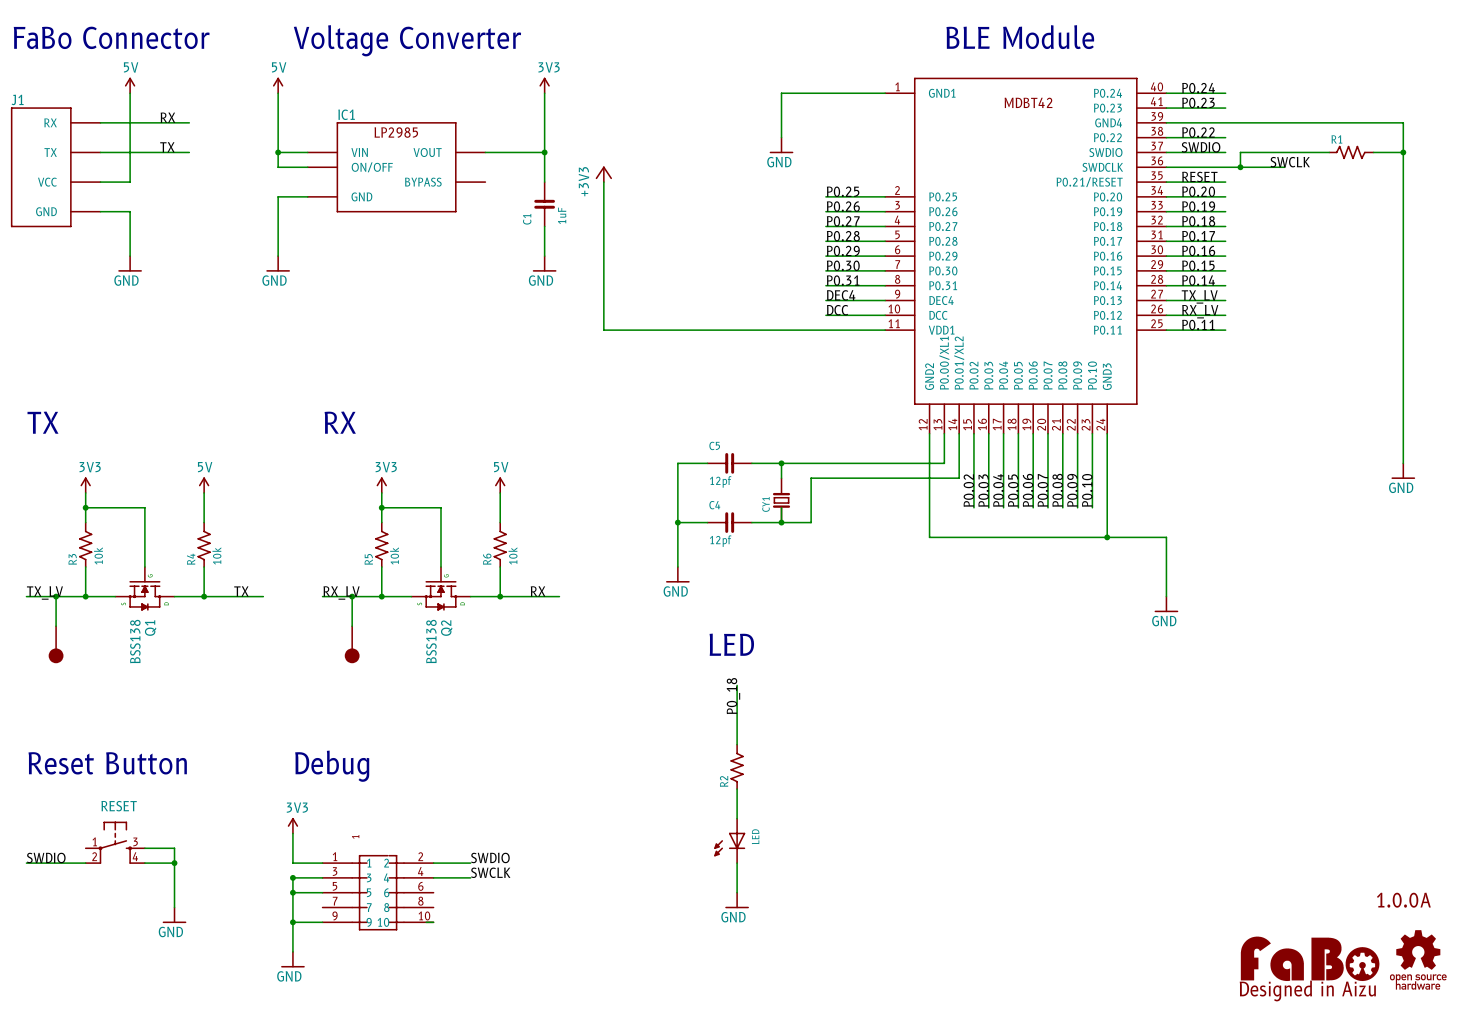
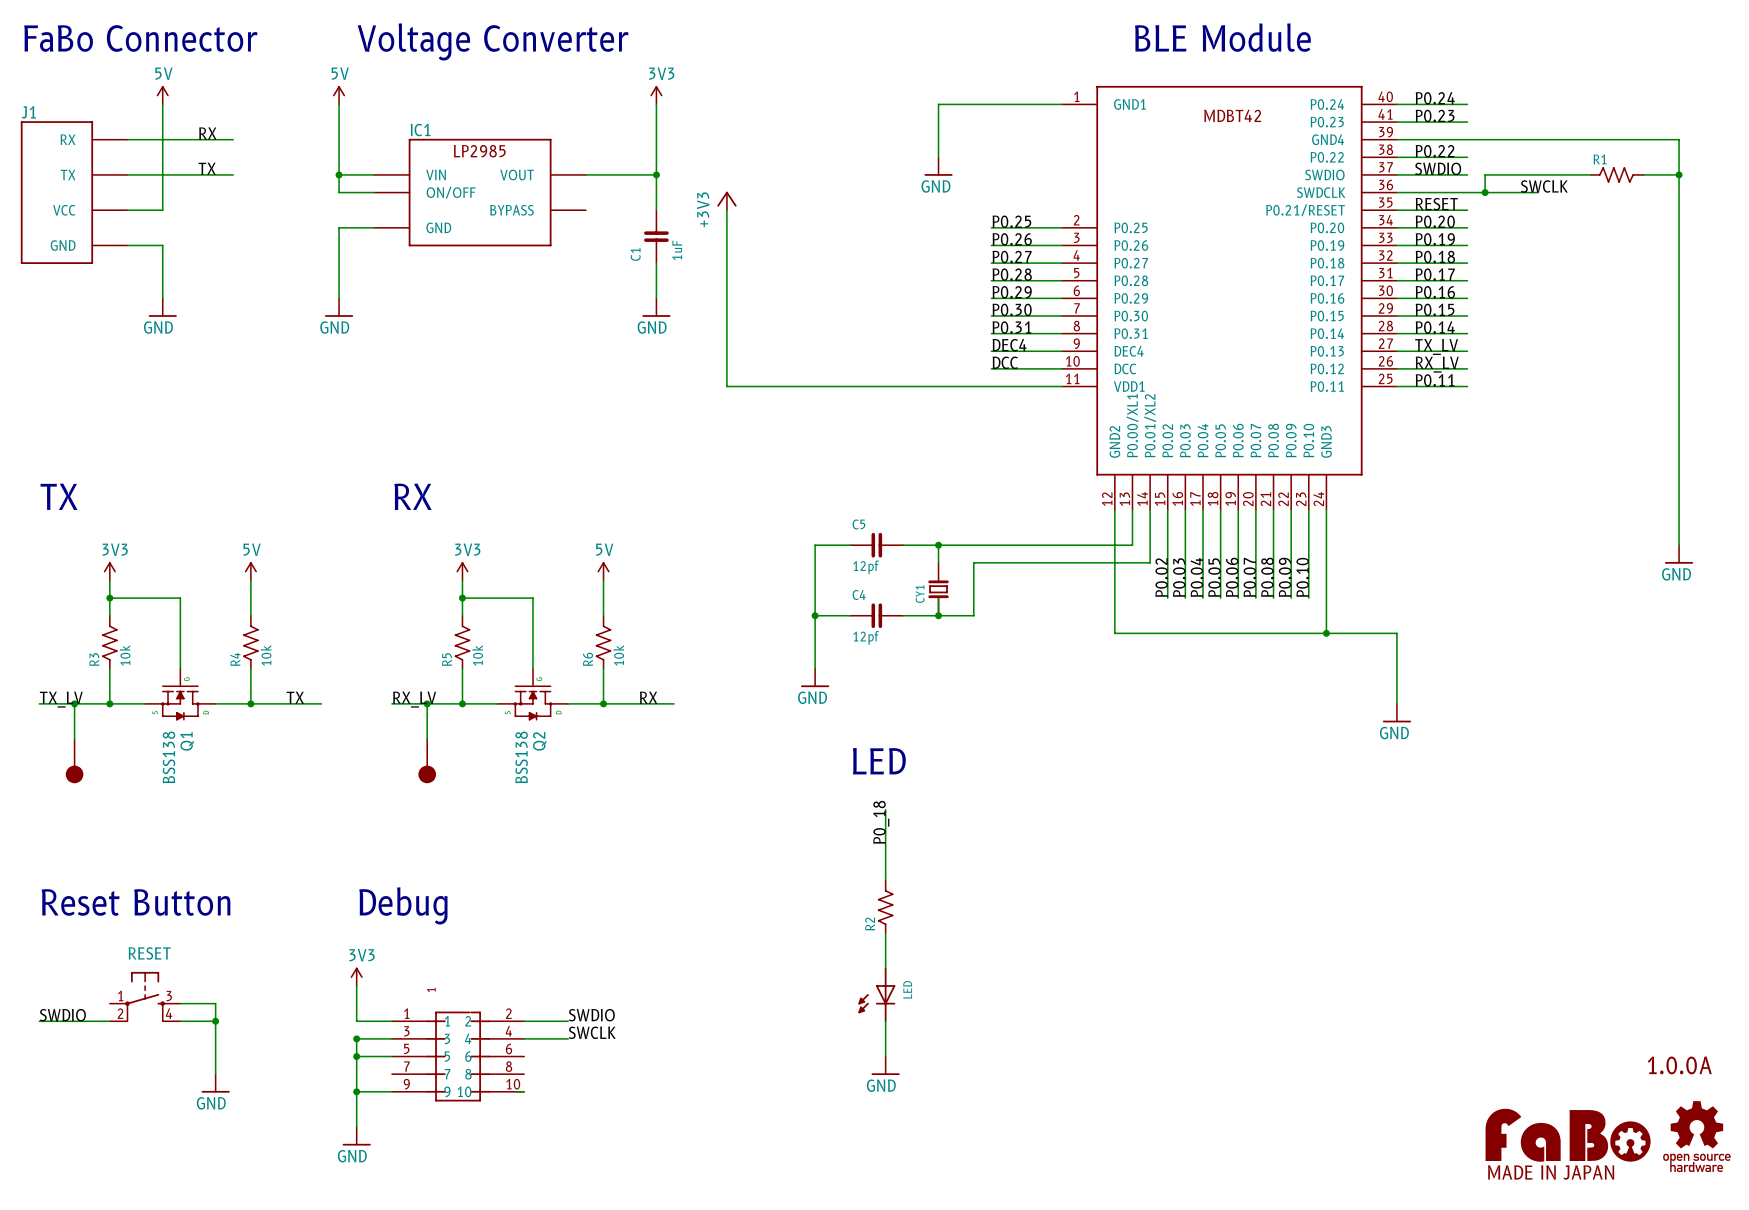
part text: none -> MADE IN JAPAN (1551, 1172)
part text: Designed in Aizu (1307, 990) -> none

